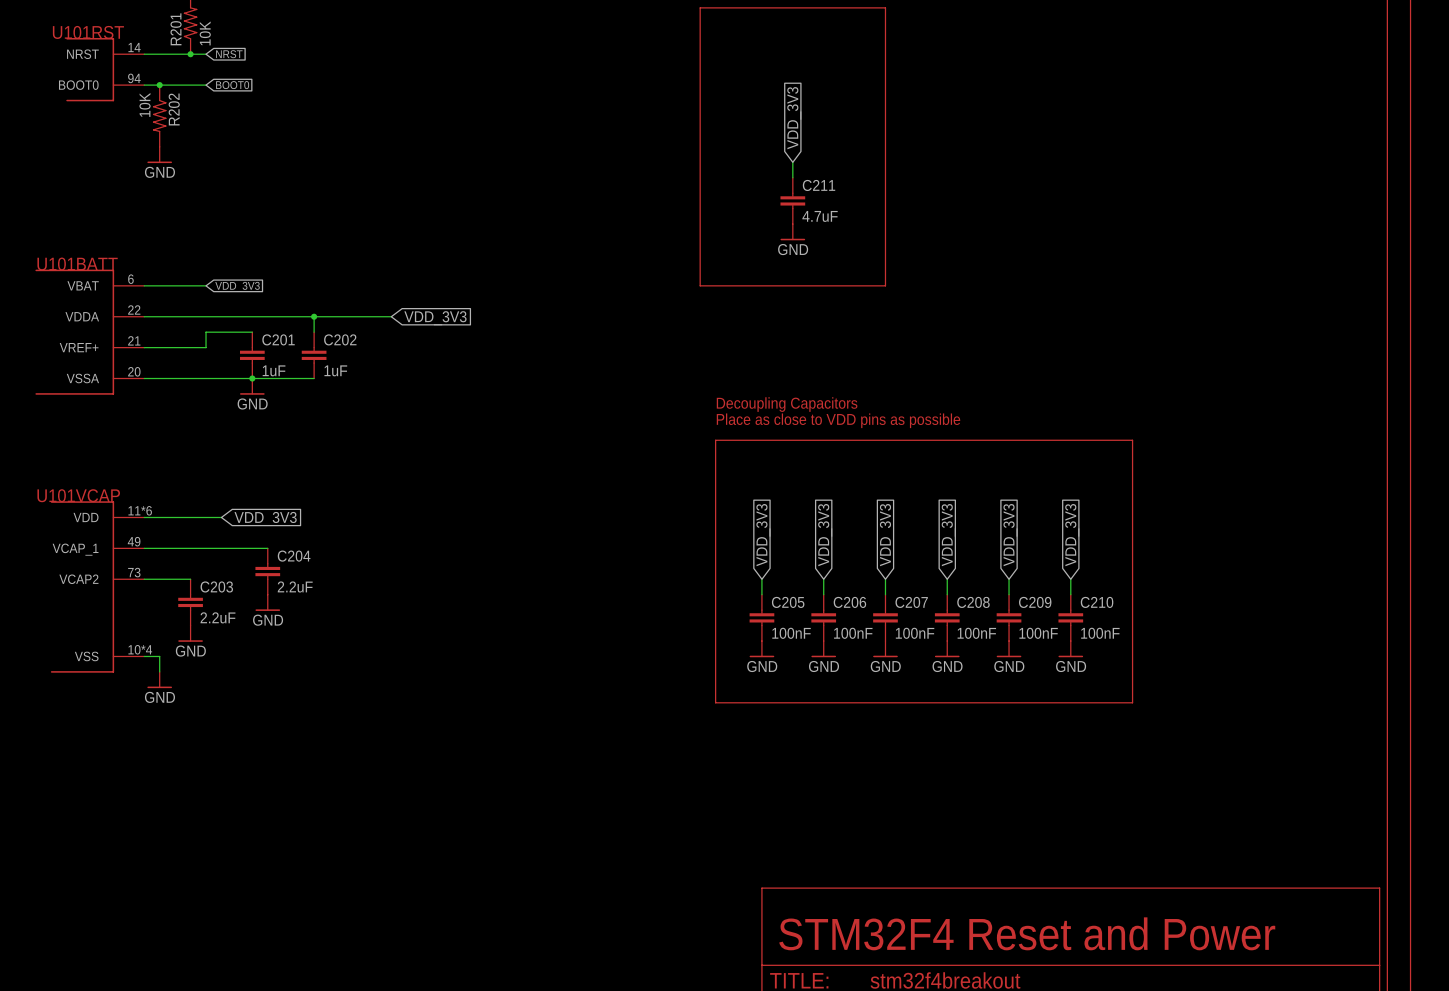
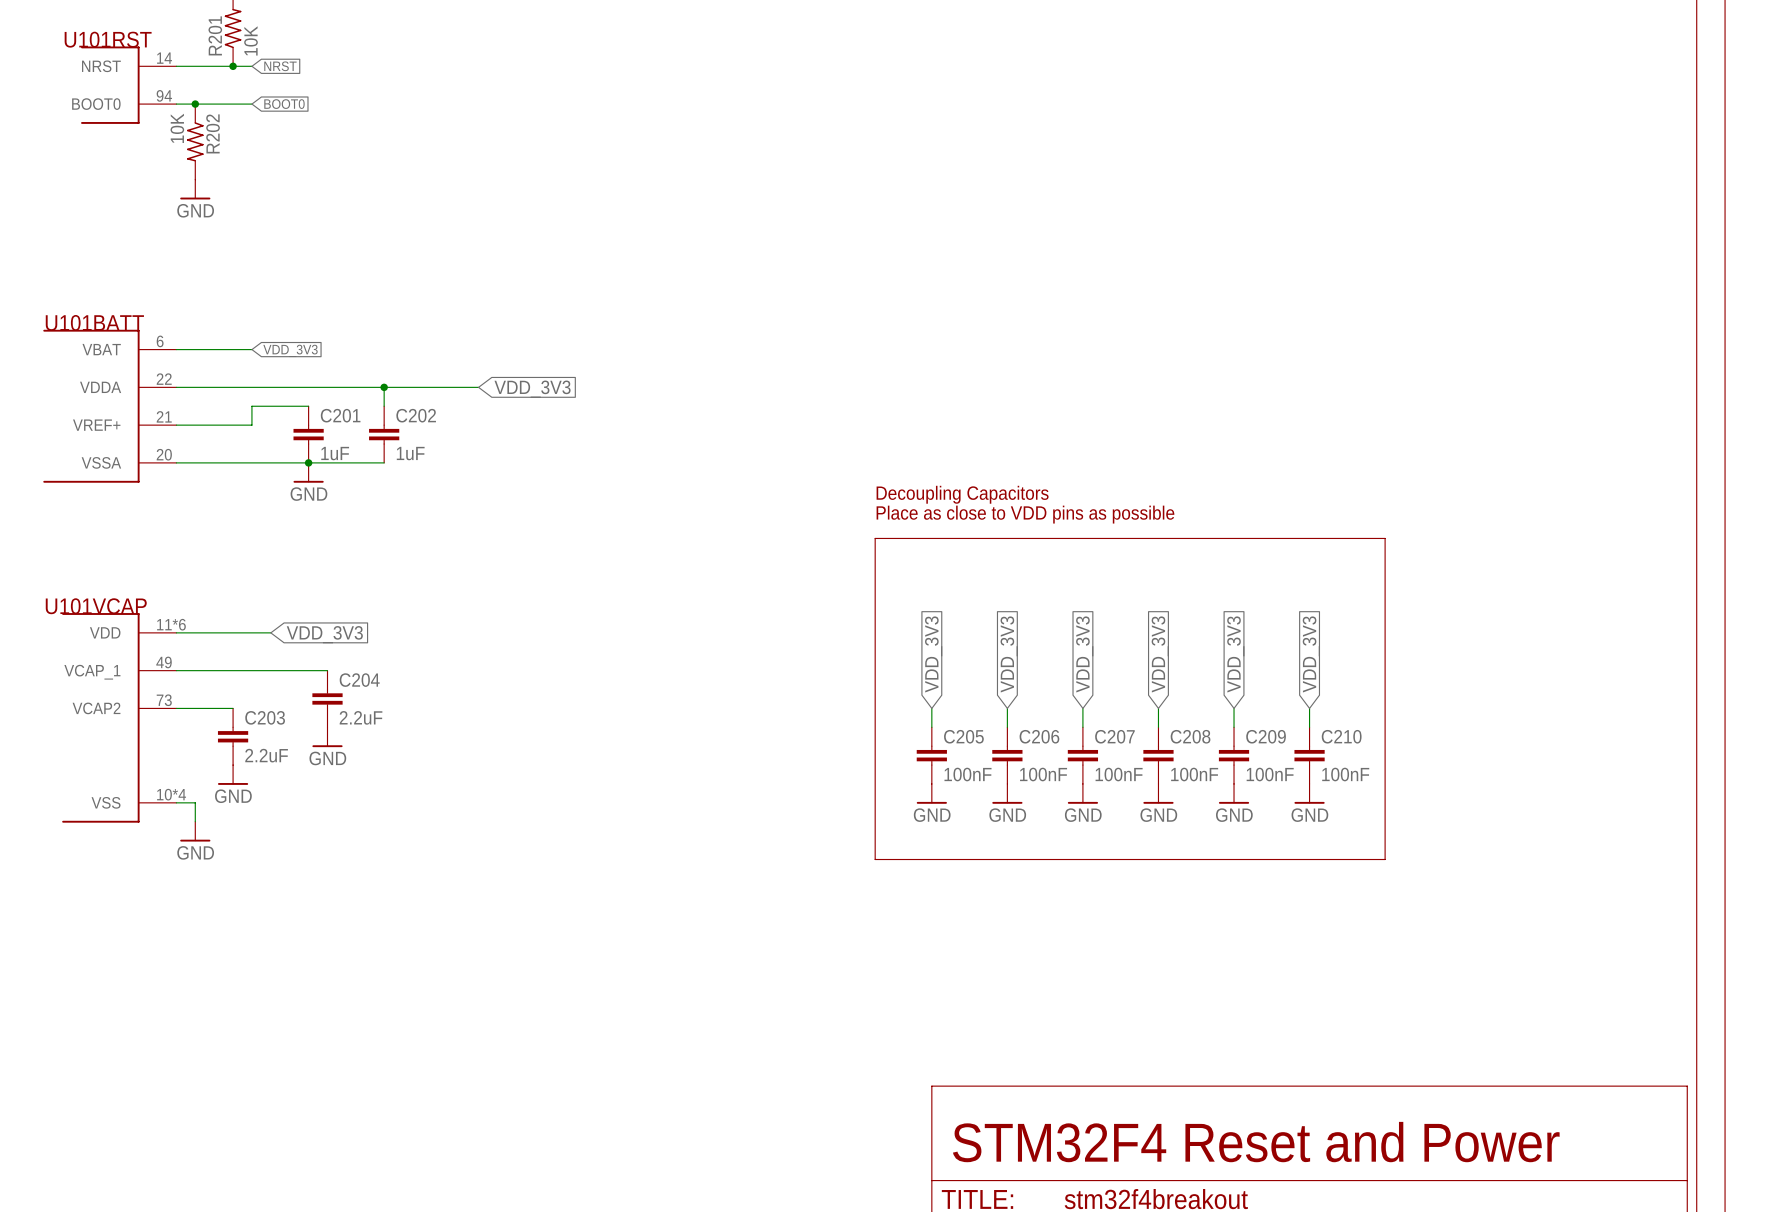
line: (700, 7) (885, 7) (885, 285) (700, 285) (700, 7) -> none
global label: VDD_3V3 (794, 118) -> none
wire: (792, 162) (792, 177) -> none
C211: 4.7uF (792, 200) -> none
power symbol: GND (792, 232) -> none

